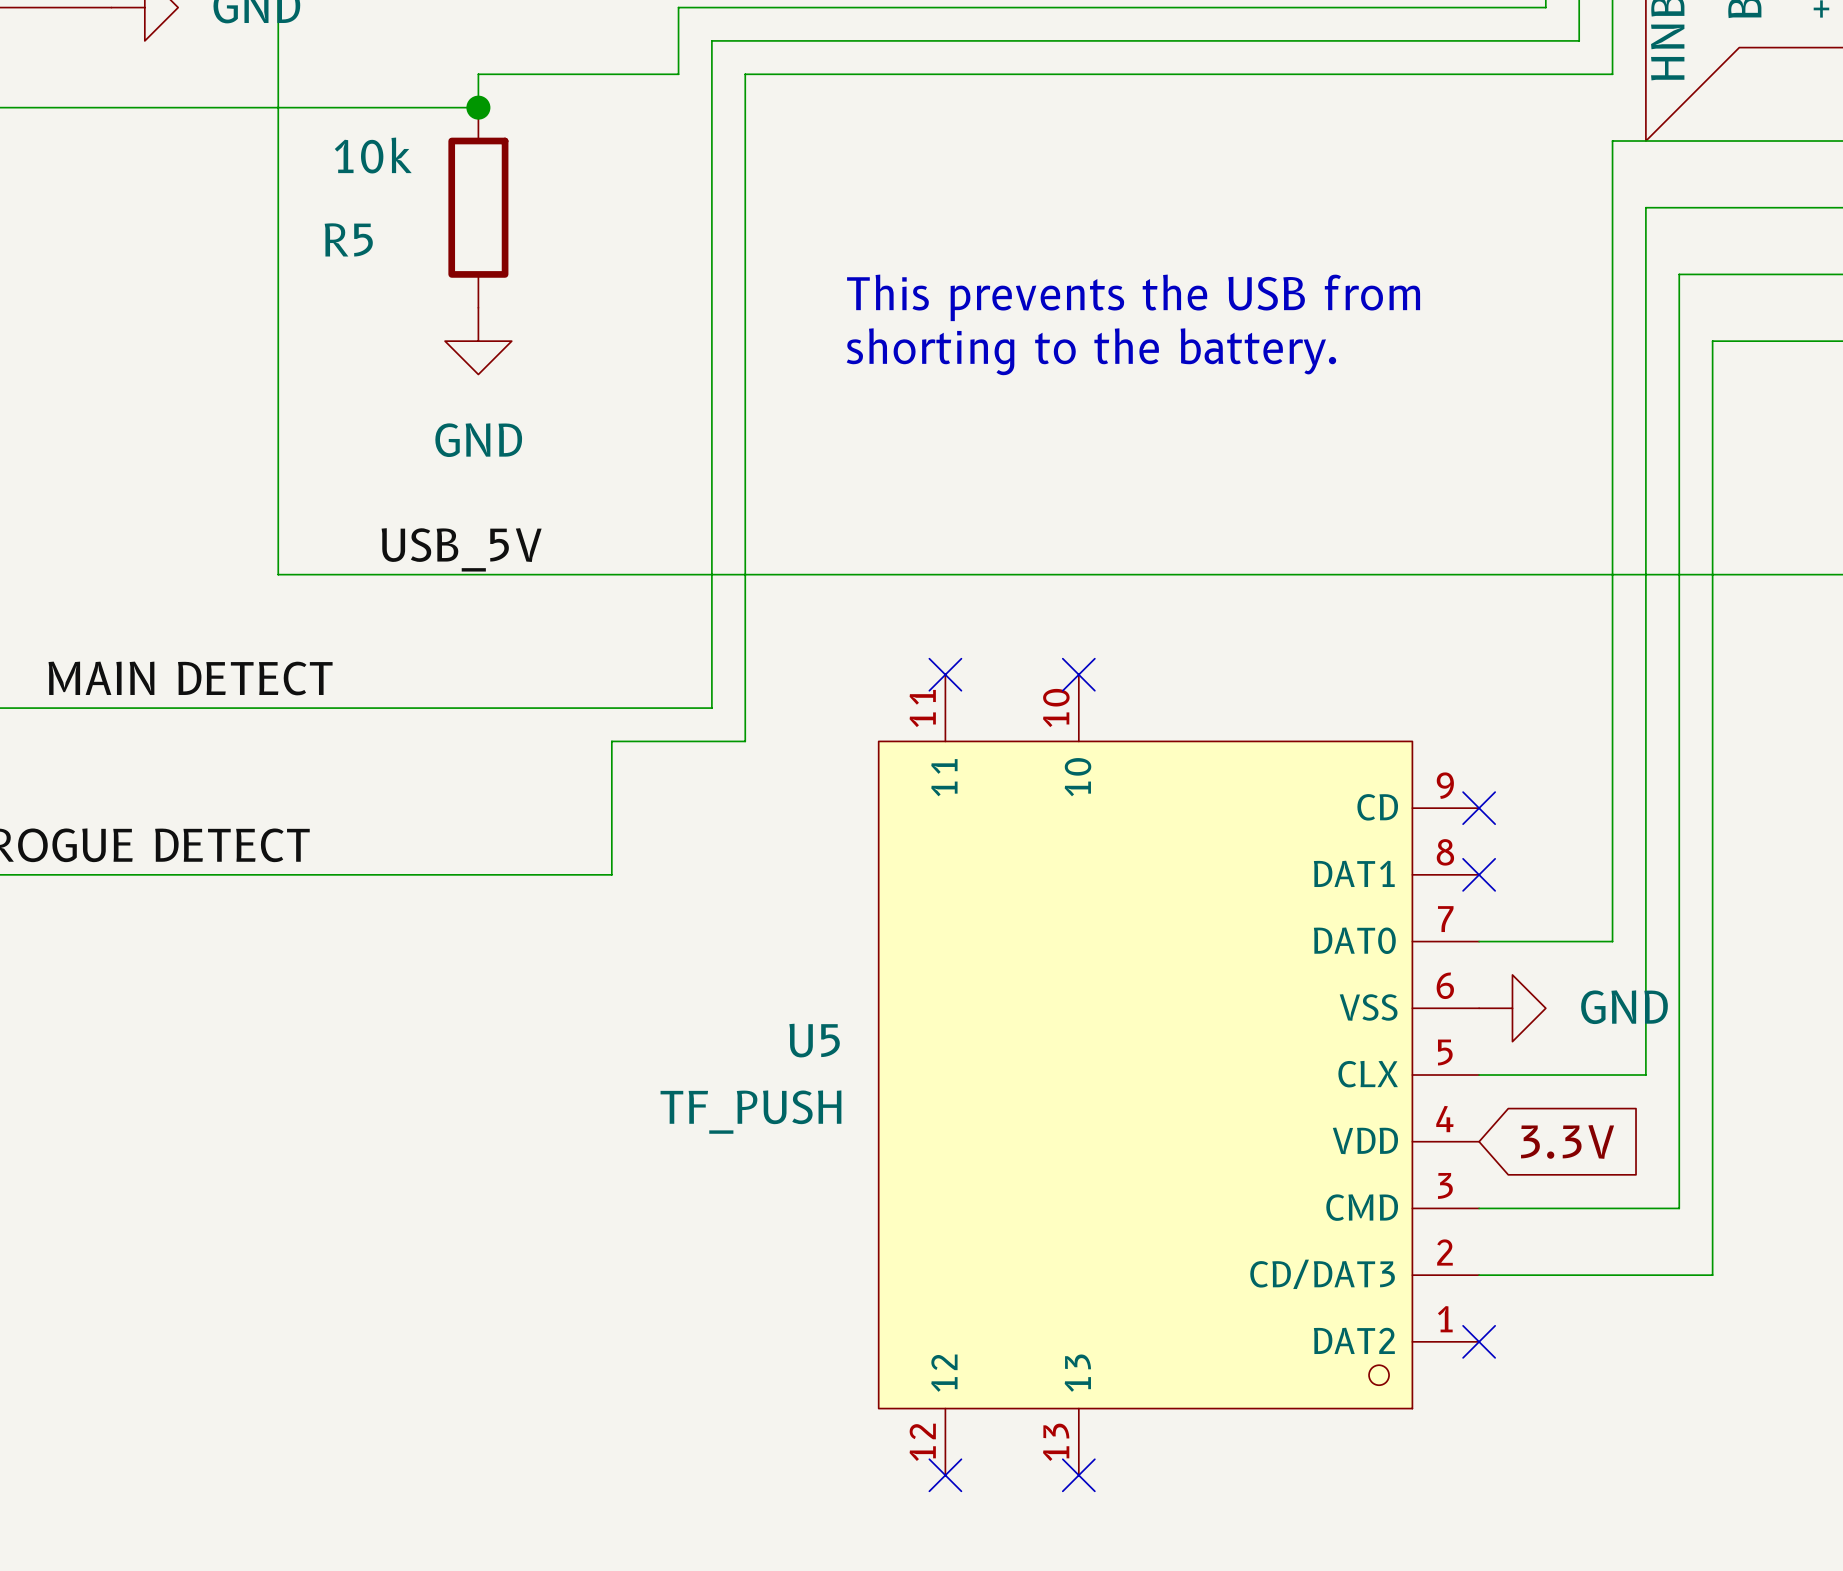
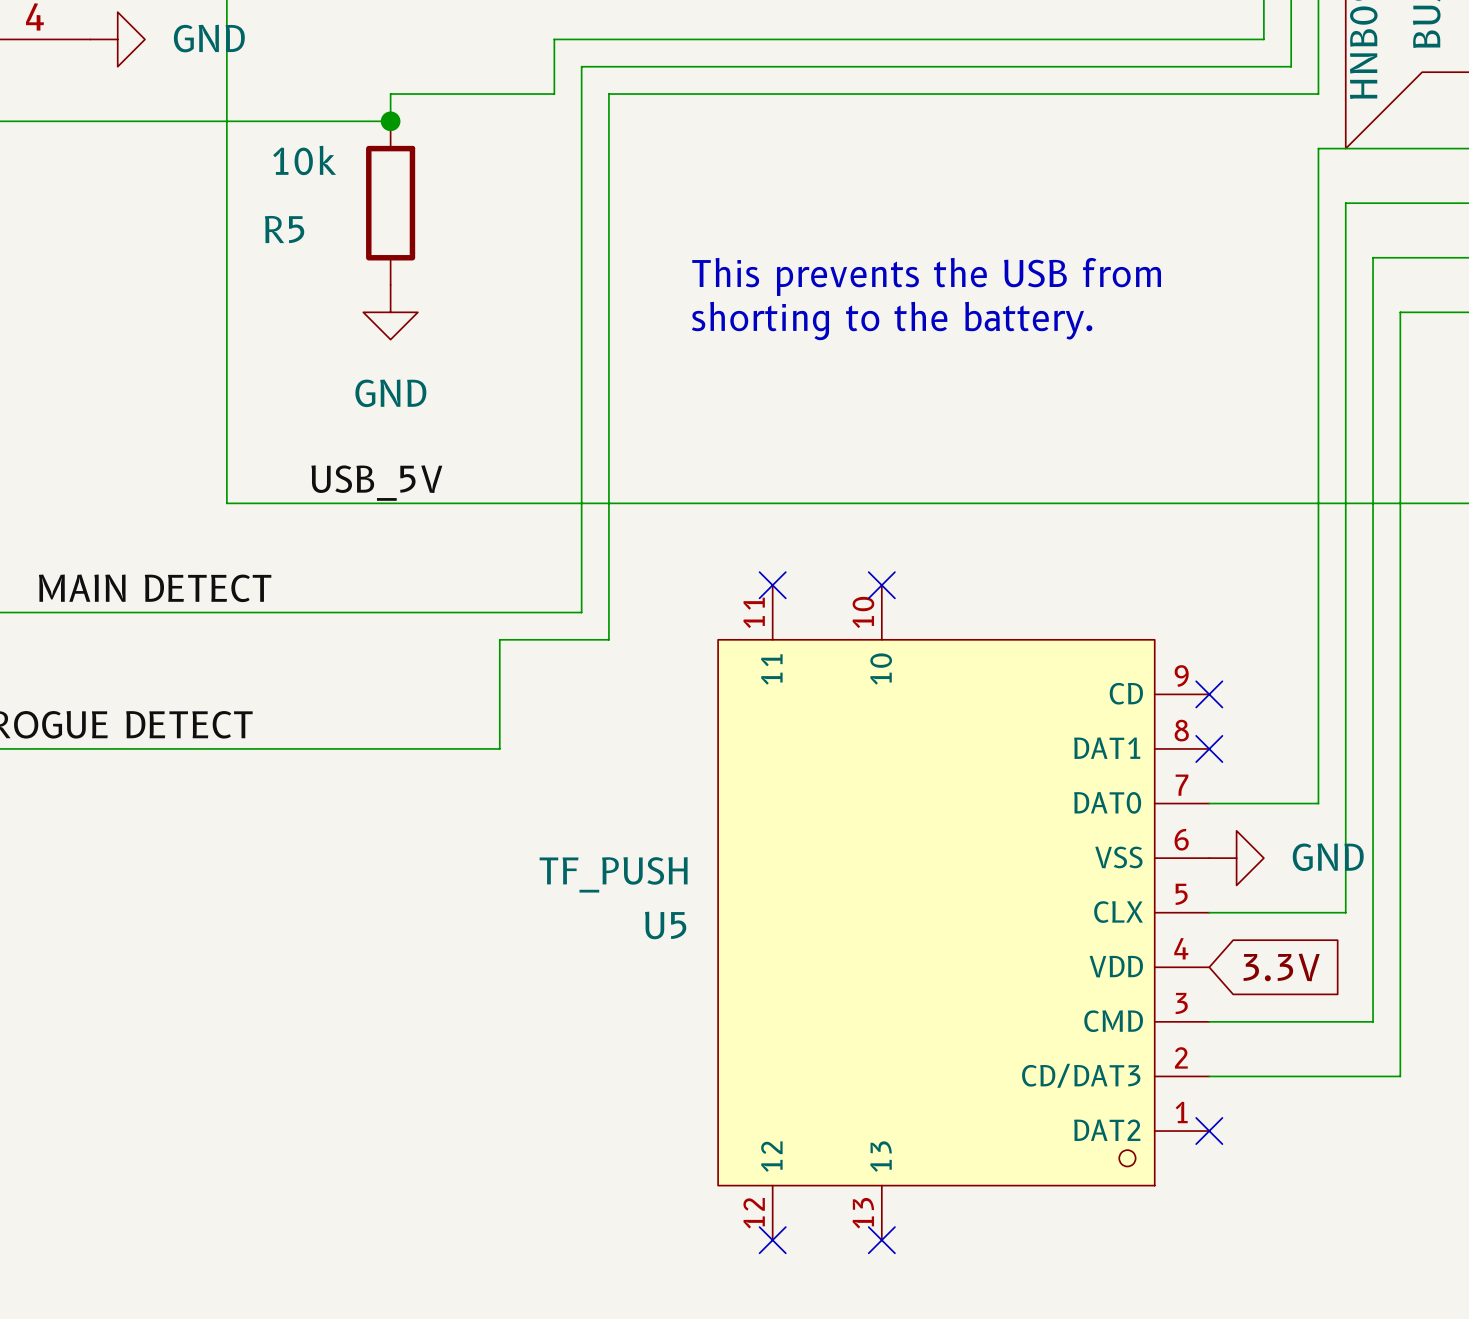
U5 name position: U5 (814, 1040) -> U5 (665, 925)
U5 value position: TF_PUSH (750, 1112) -> TF_PUSH (613, 874)

